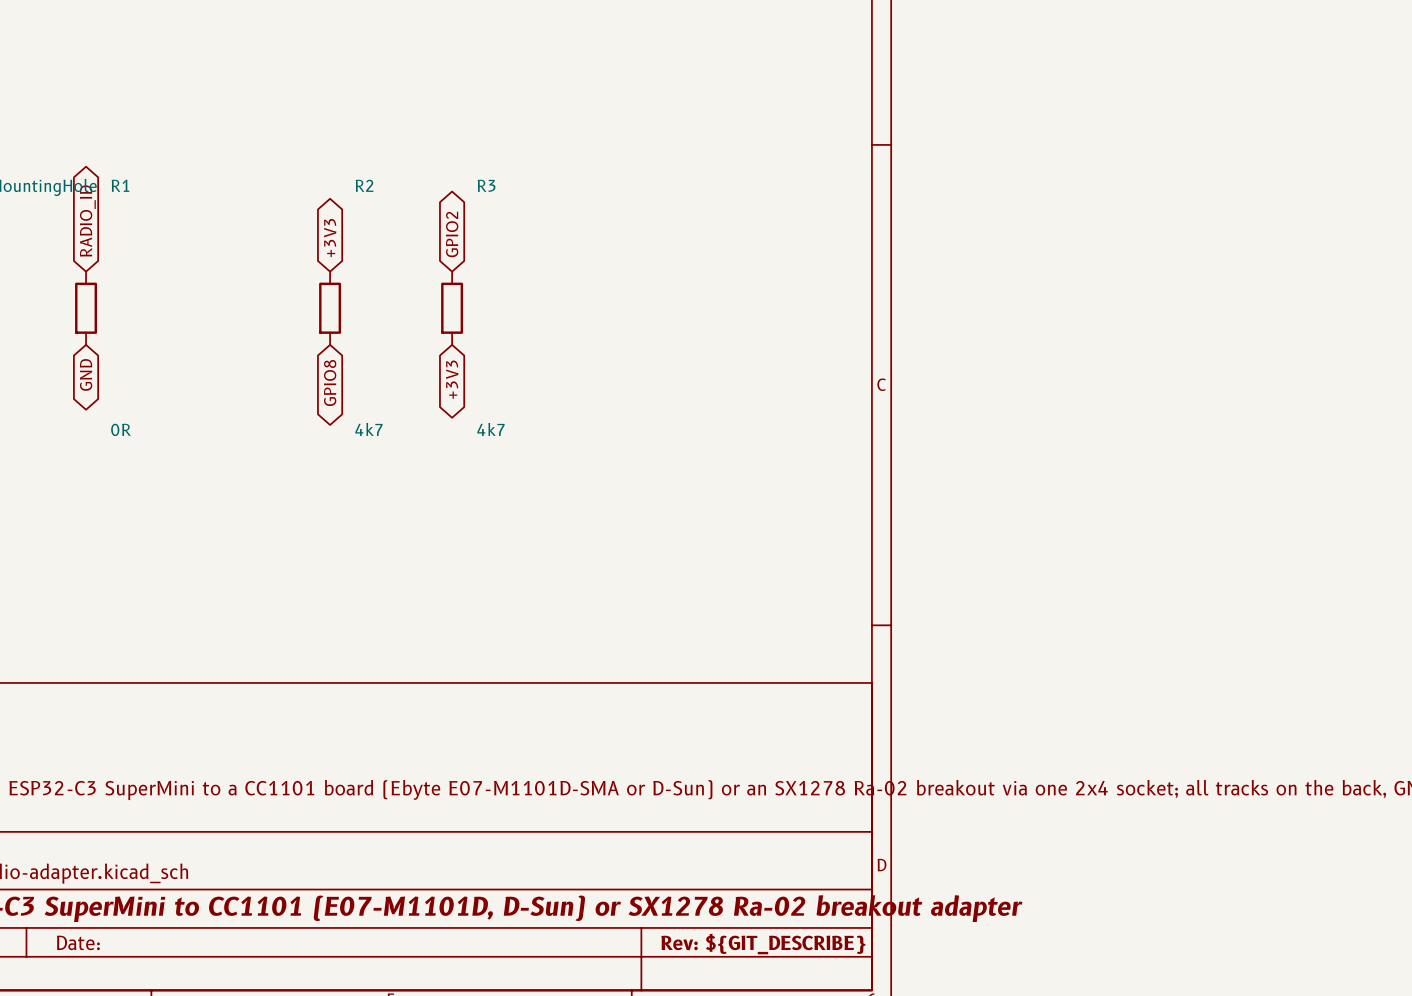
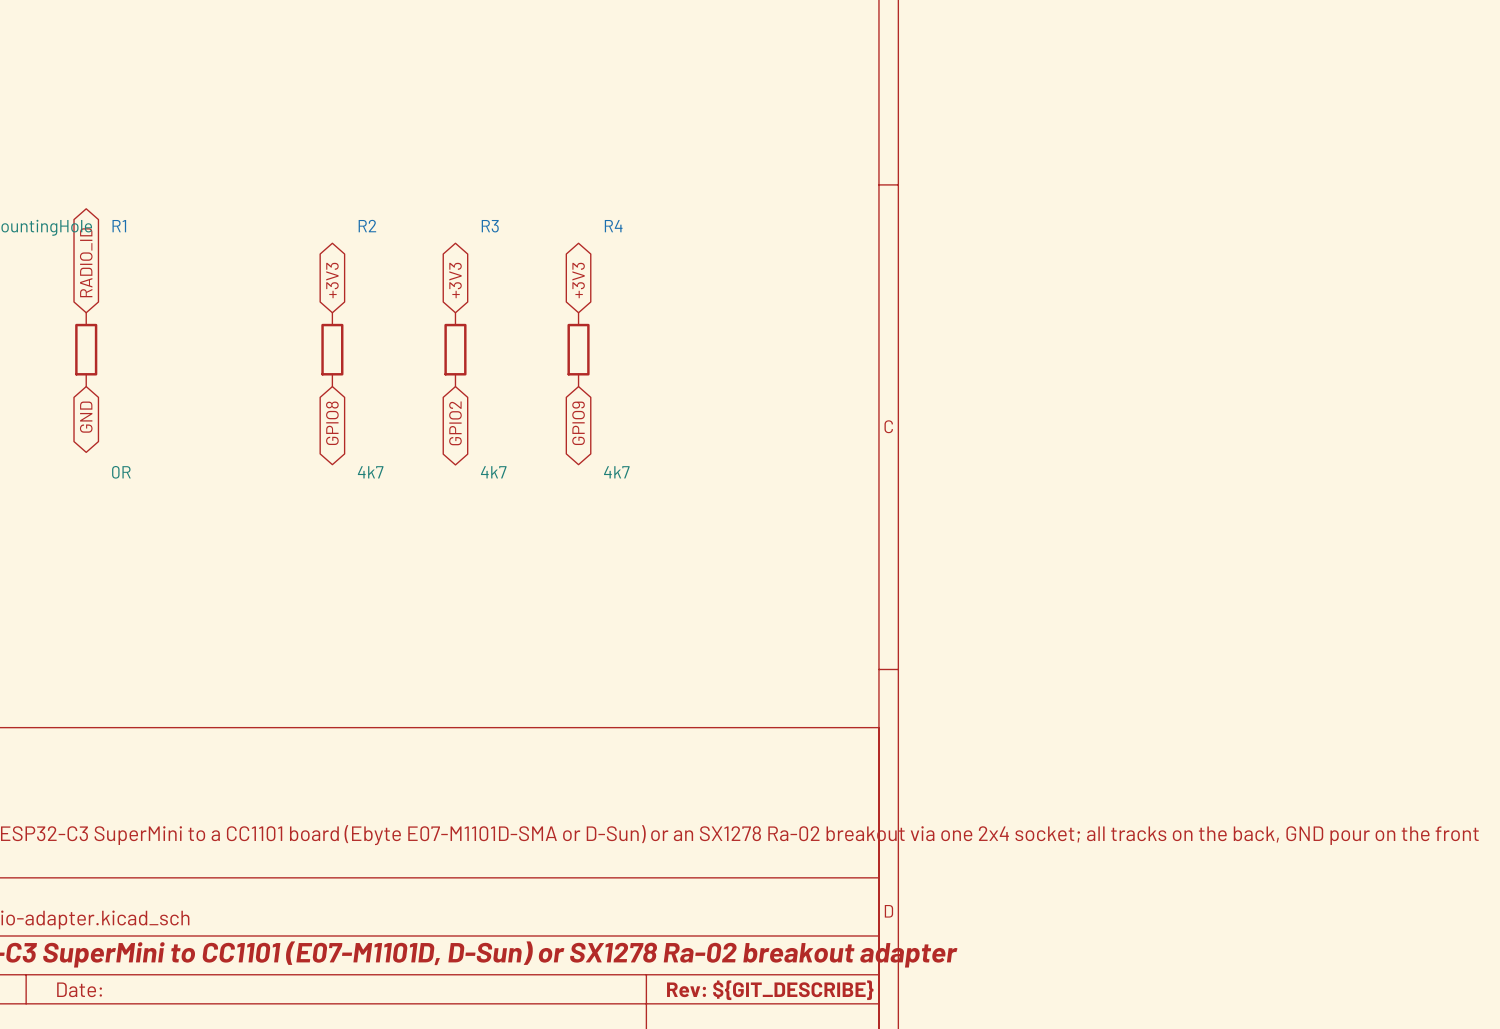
global label: GPIO2 (452, 234) -> +3V3 (455, 280)
global label: none -> +3V3 (578, 280)
R4: none -> 4k7 (578, 349)
global label: +3V3 (452, 379) -> GPIO2 (455, 423)
global label: none -> GPIO9 (578, 423)

